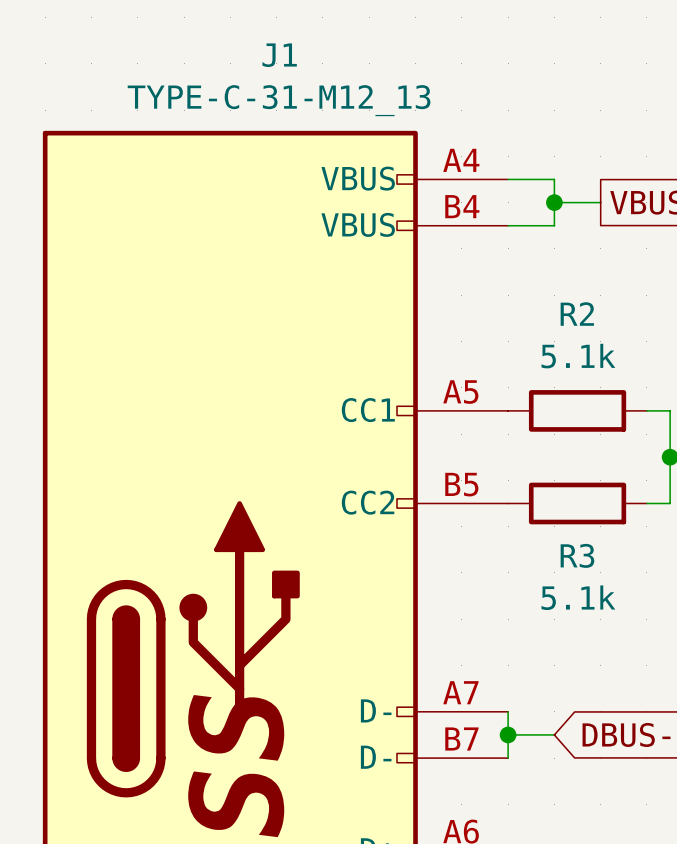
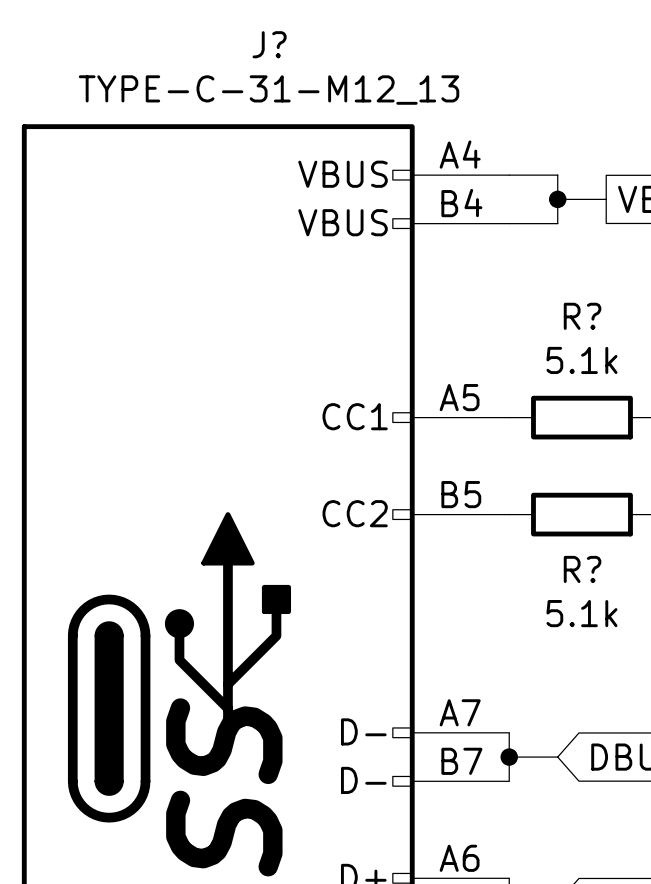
J1 name: J1 (279, 55) -> J? (269, 44)
R2 name: R2 (577, 314) -> R? (582, 316)
R3 name: R3 (577, 555) -> R? (582, 569)

